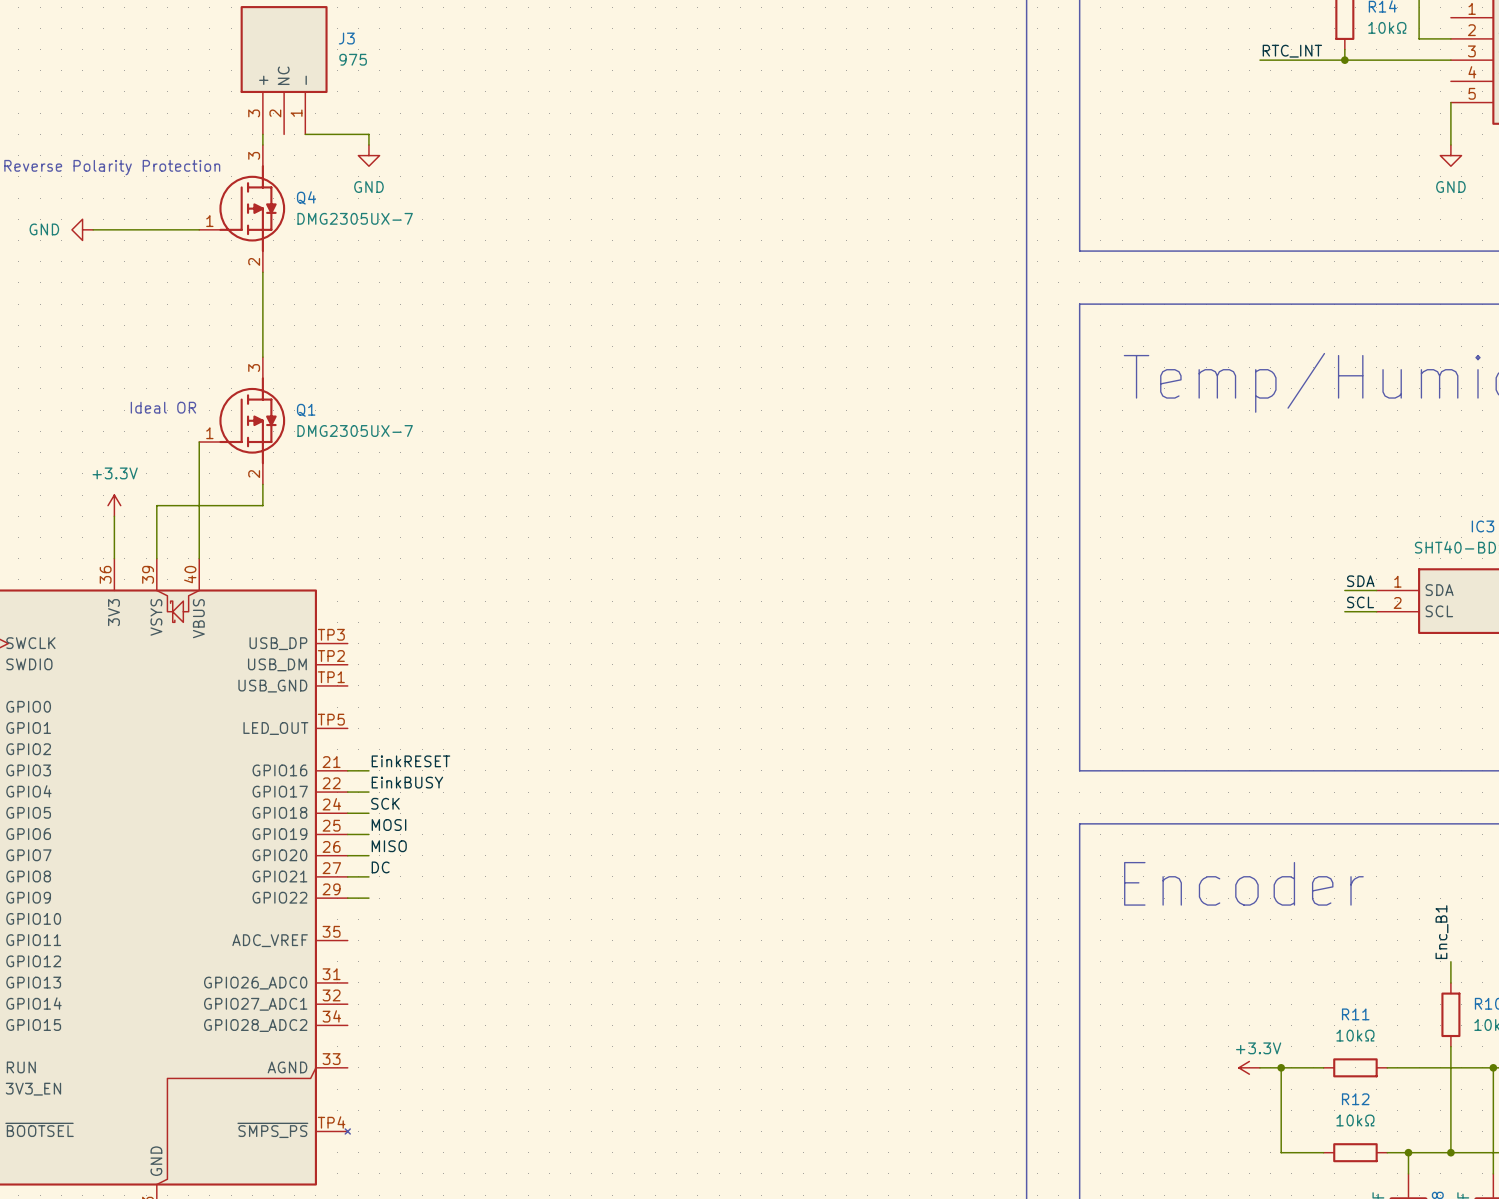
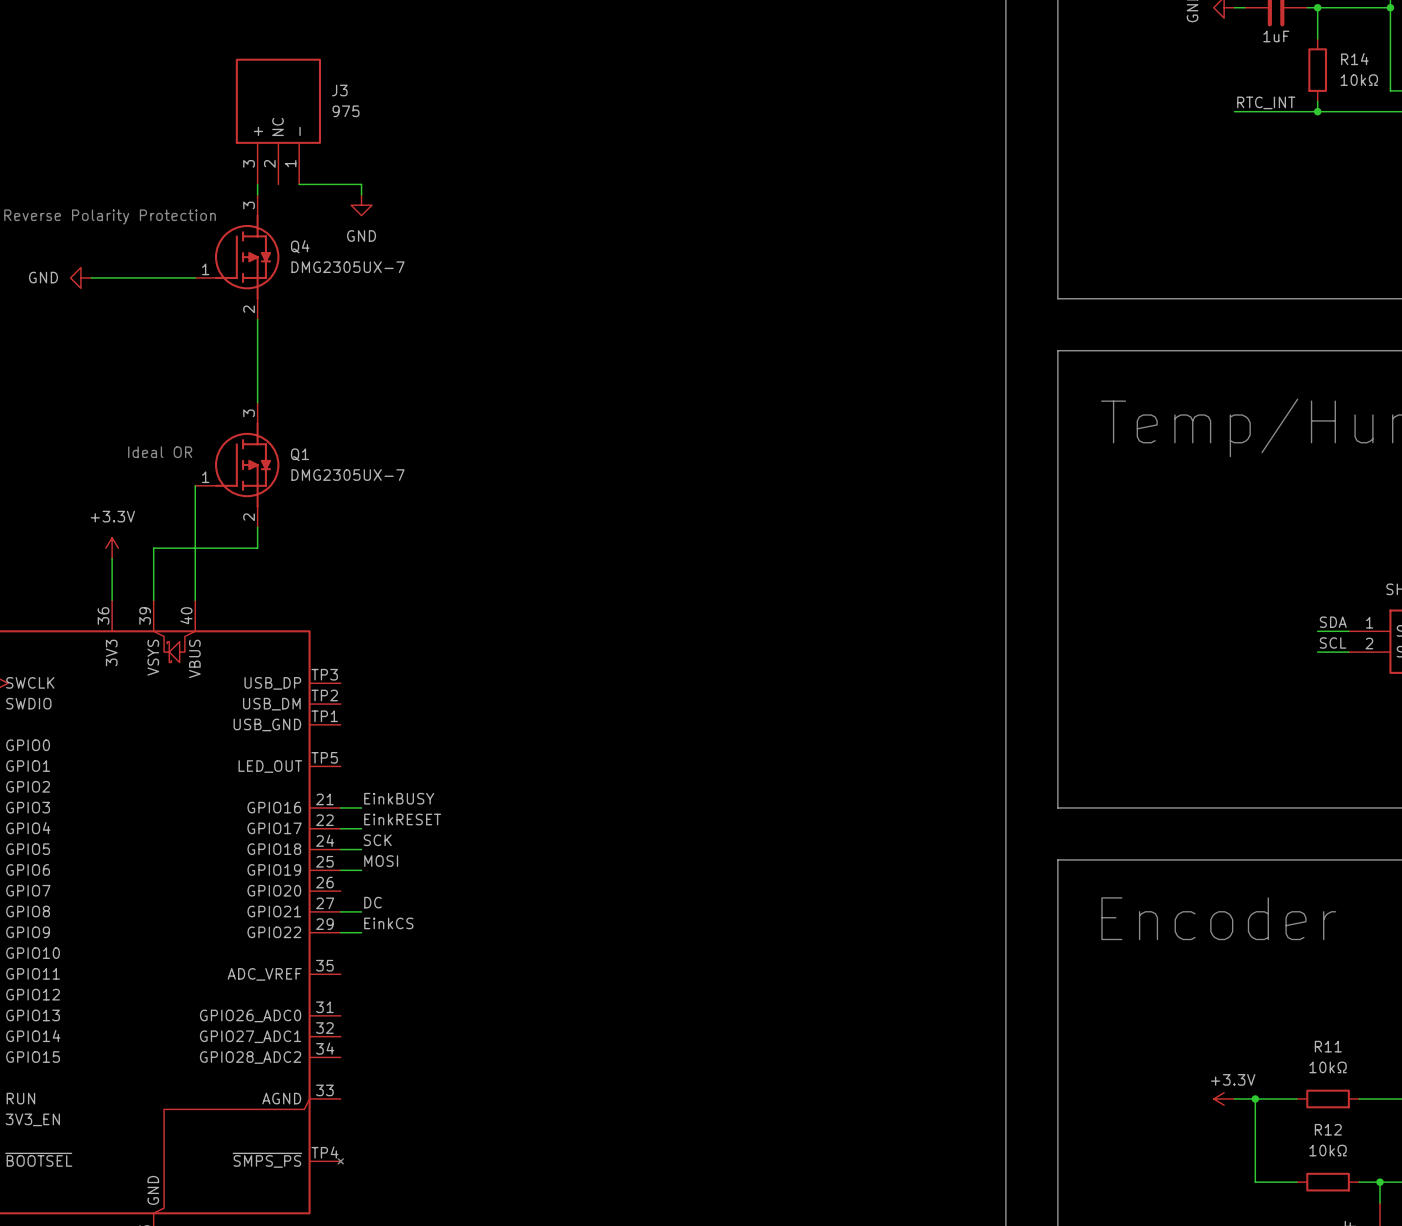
label: EinkRESET (410, 761) -> EinkBUSY (399, 798)
label: EinkBUSY (407, 782) -> EinkRESET (402, 819)
label: MISO (389, 846) -> none
wire: (347, 855) (368, 855) -> none
label: none -> EinkCS (388, 923)

